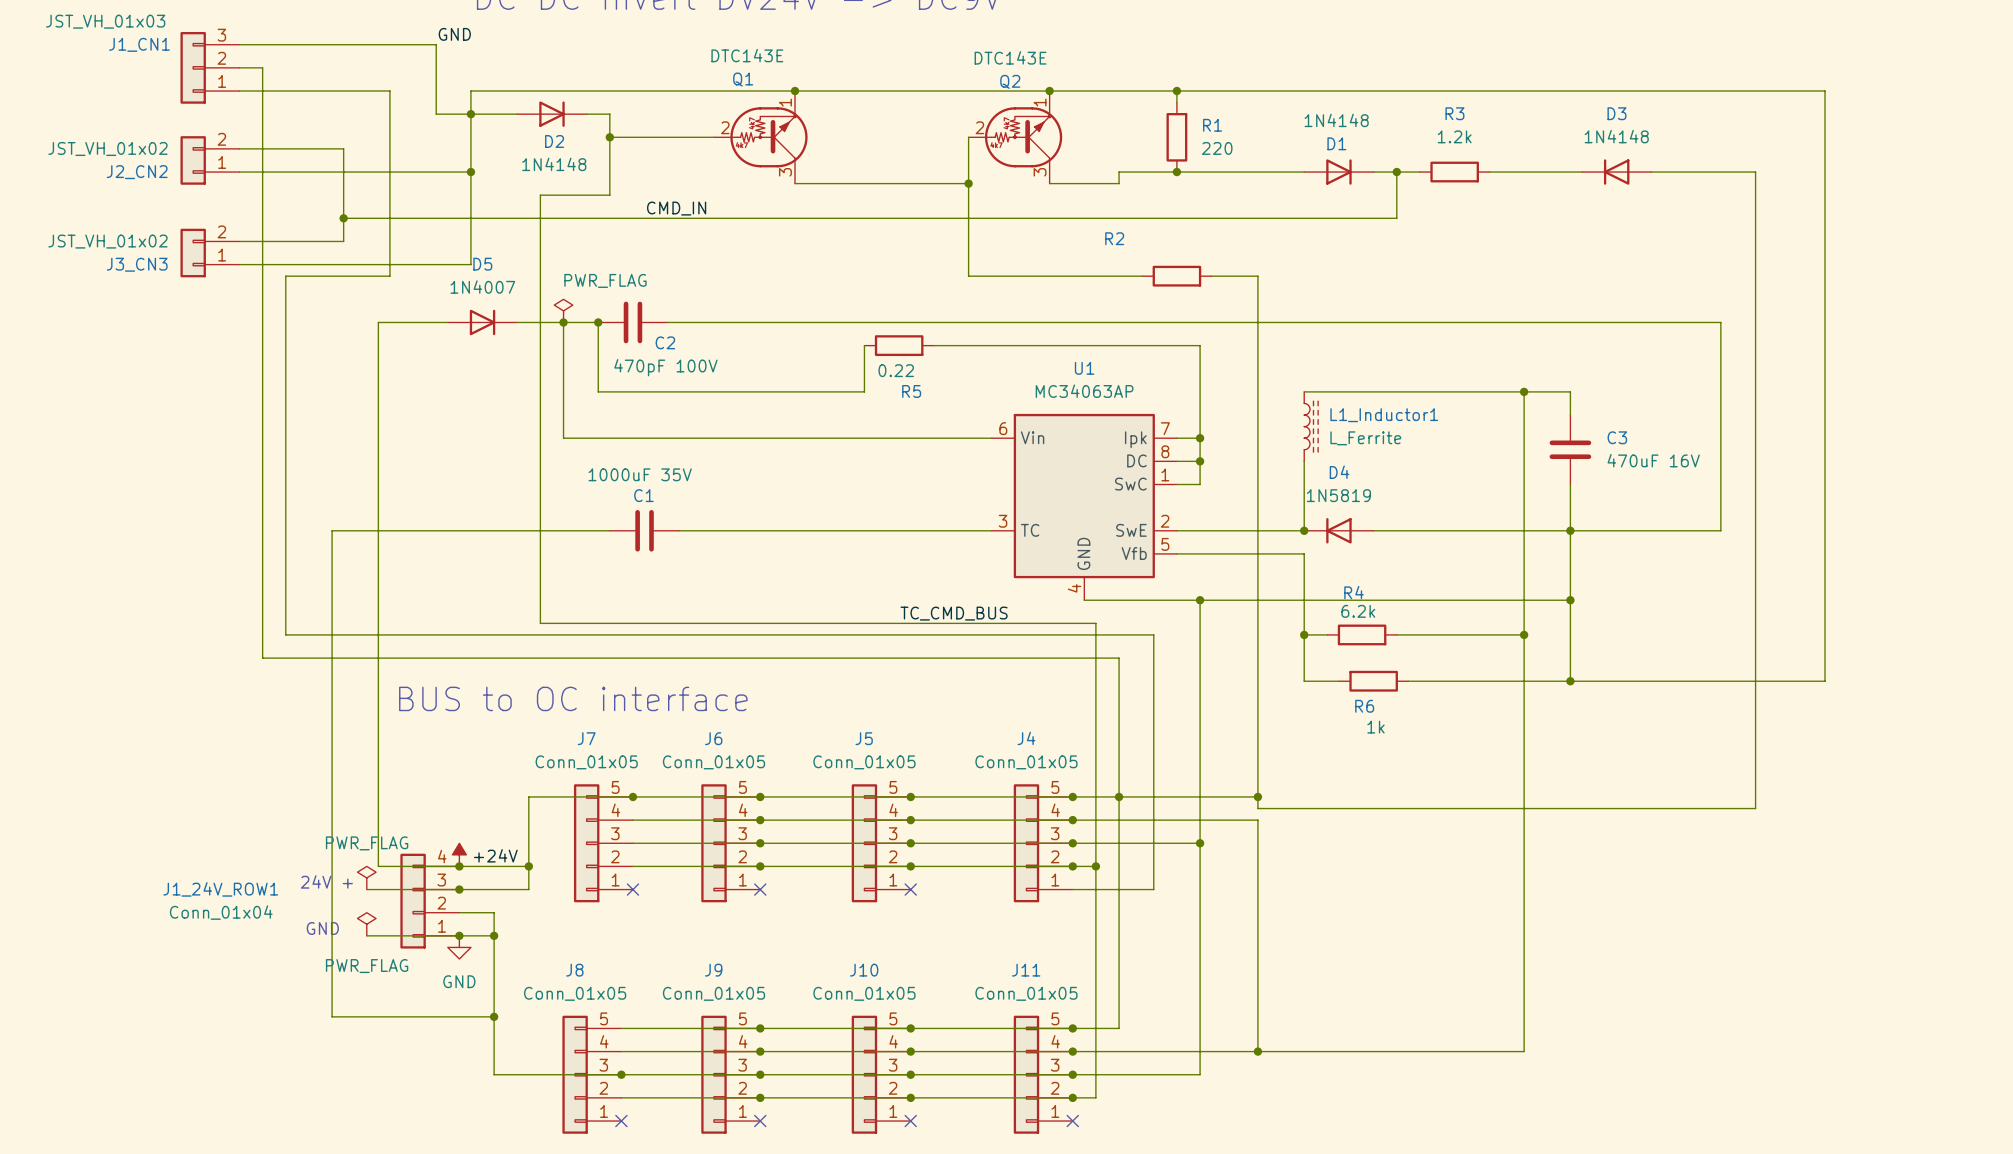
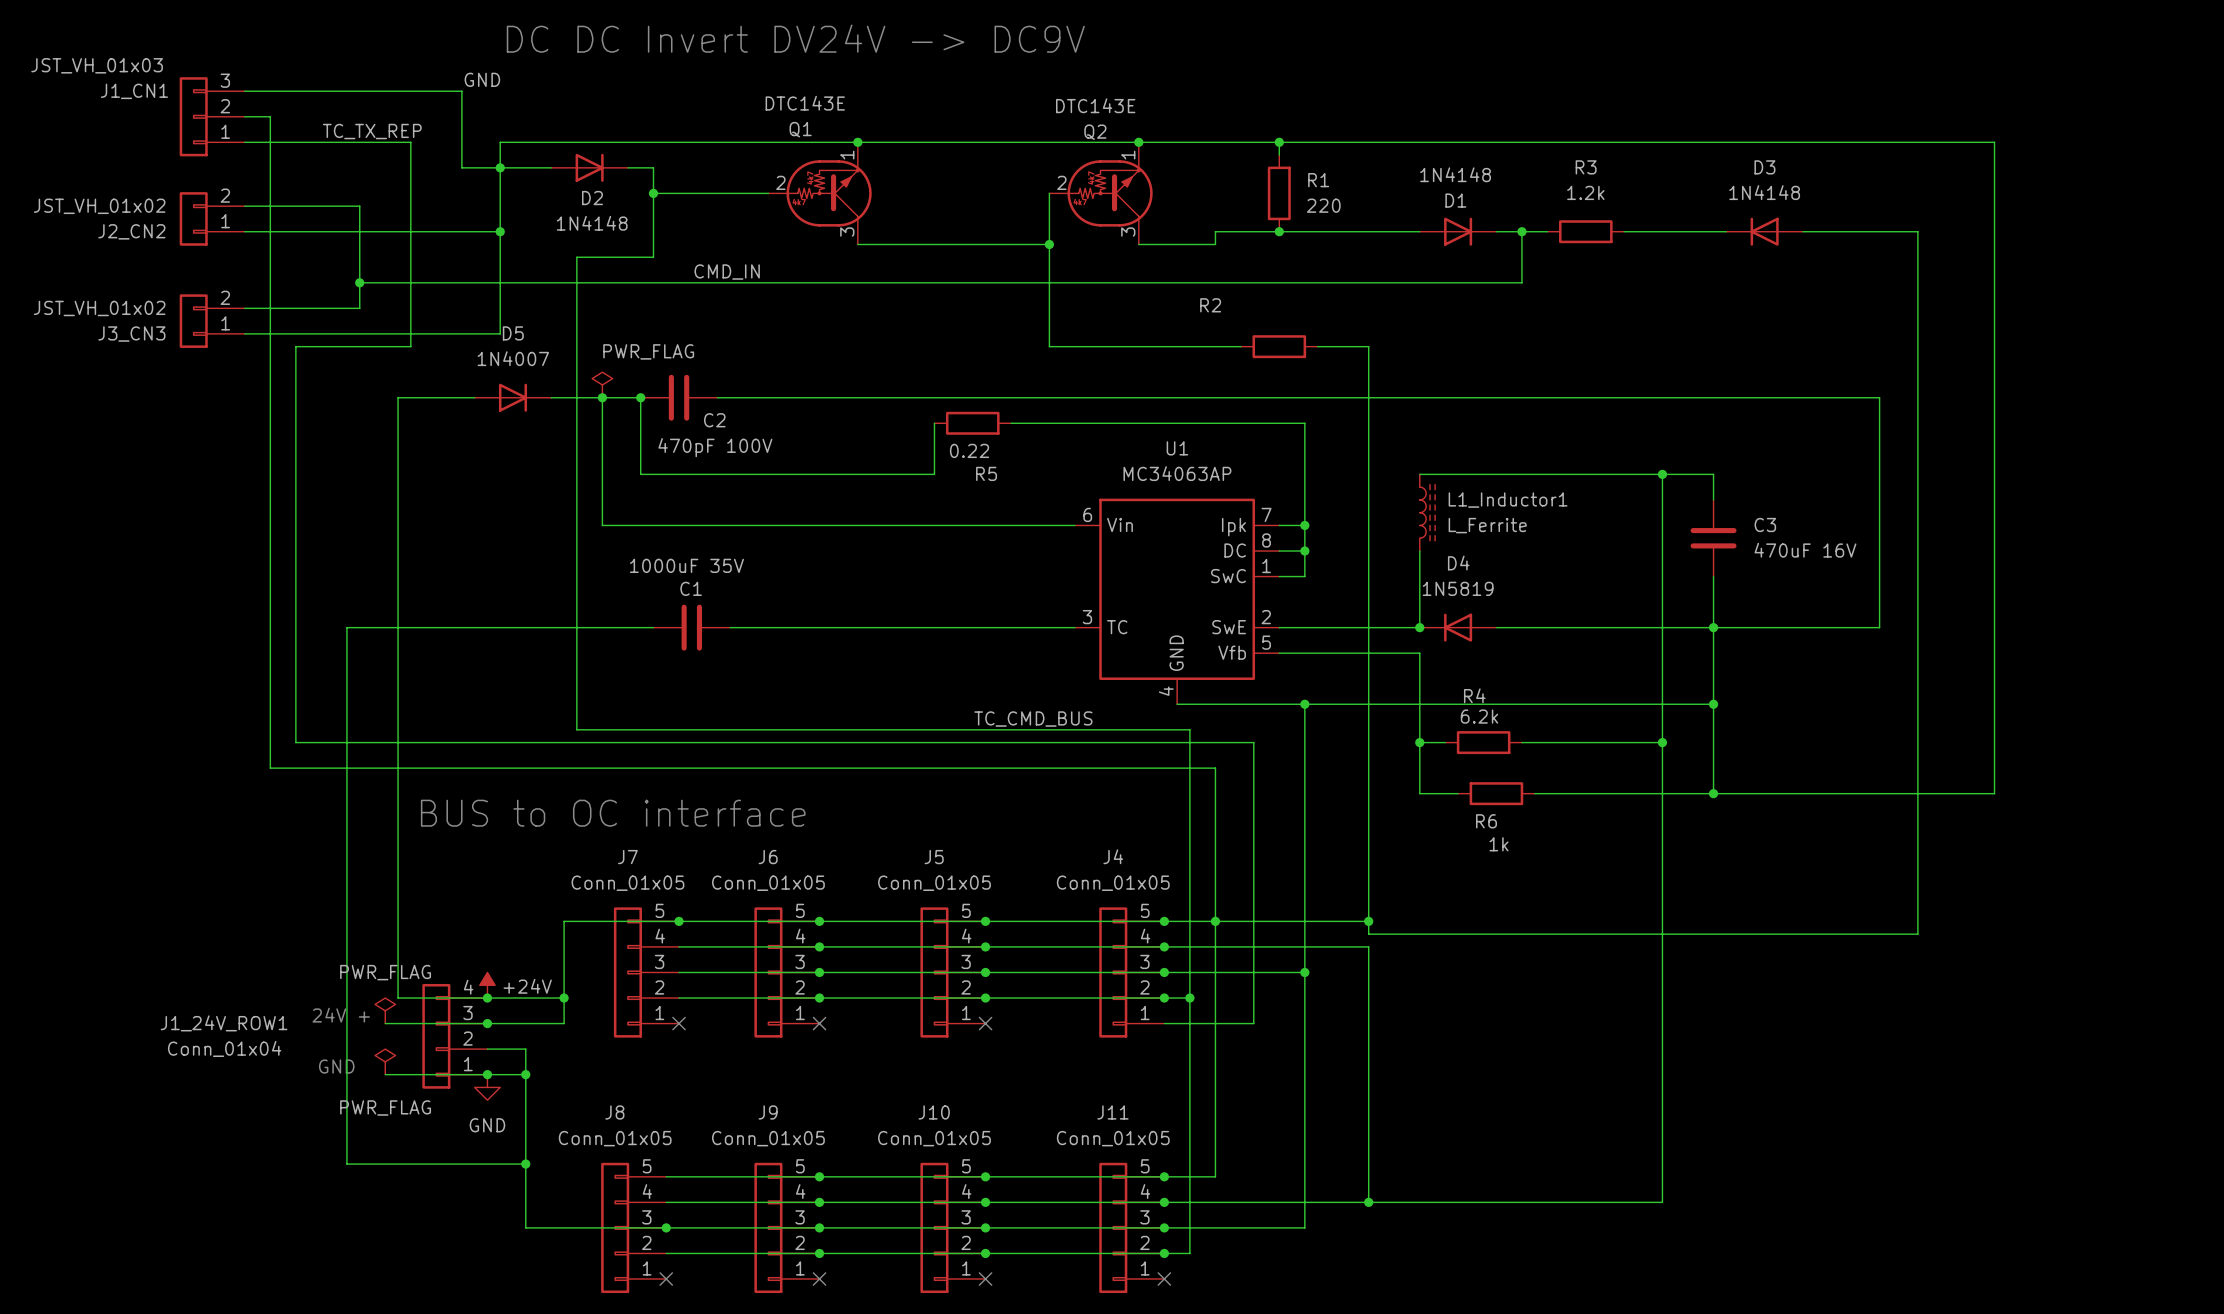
label: none -> TC_TX_REP (372, 131)

